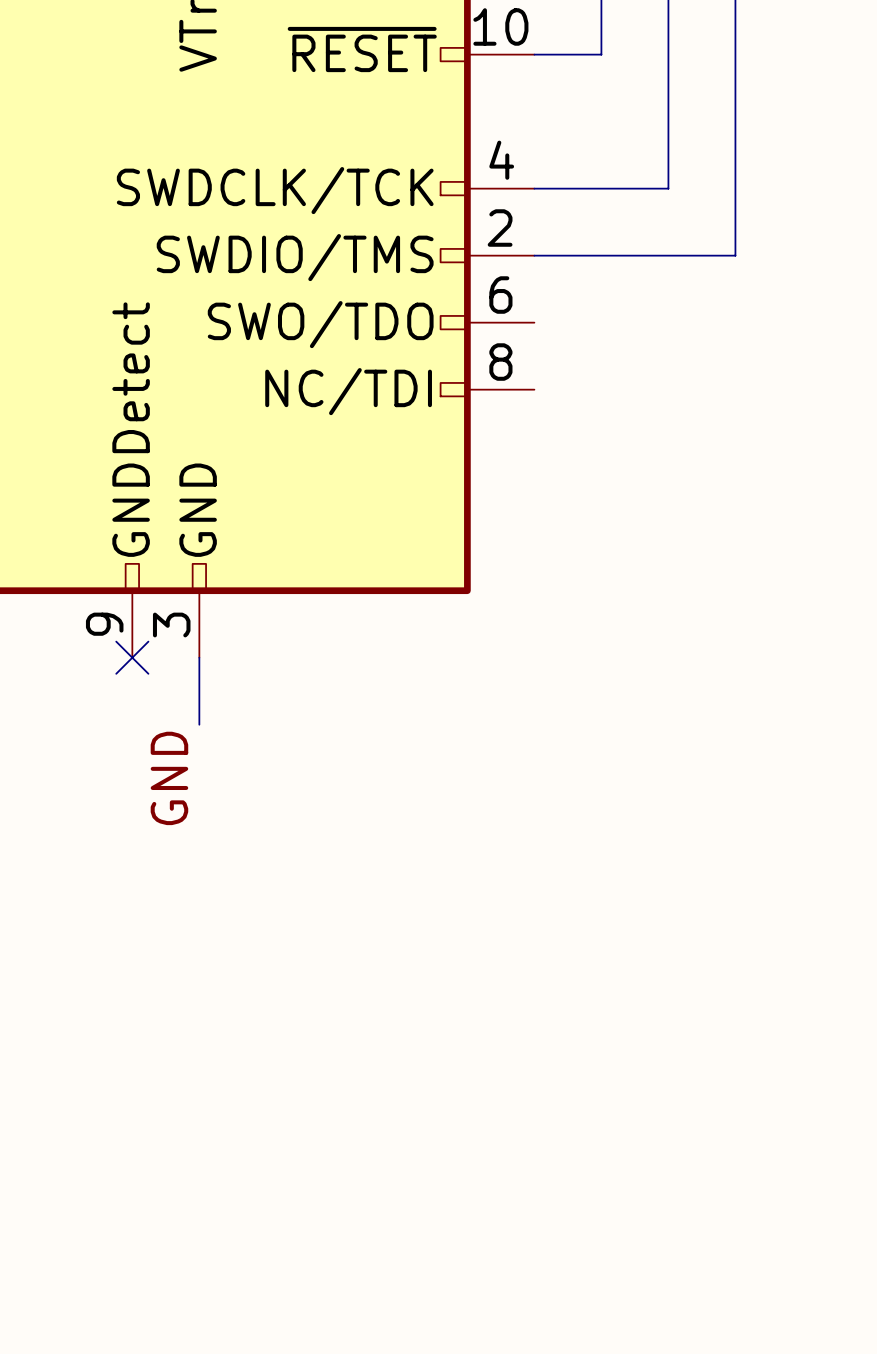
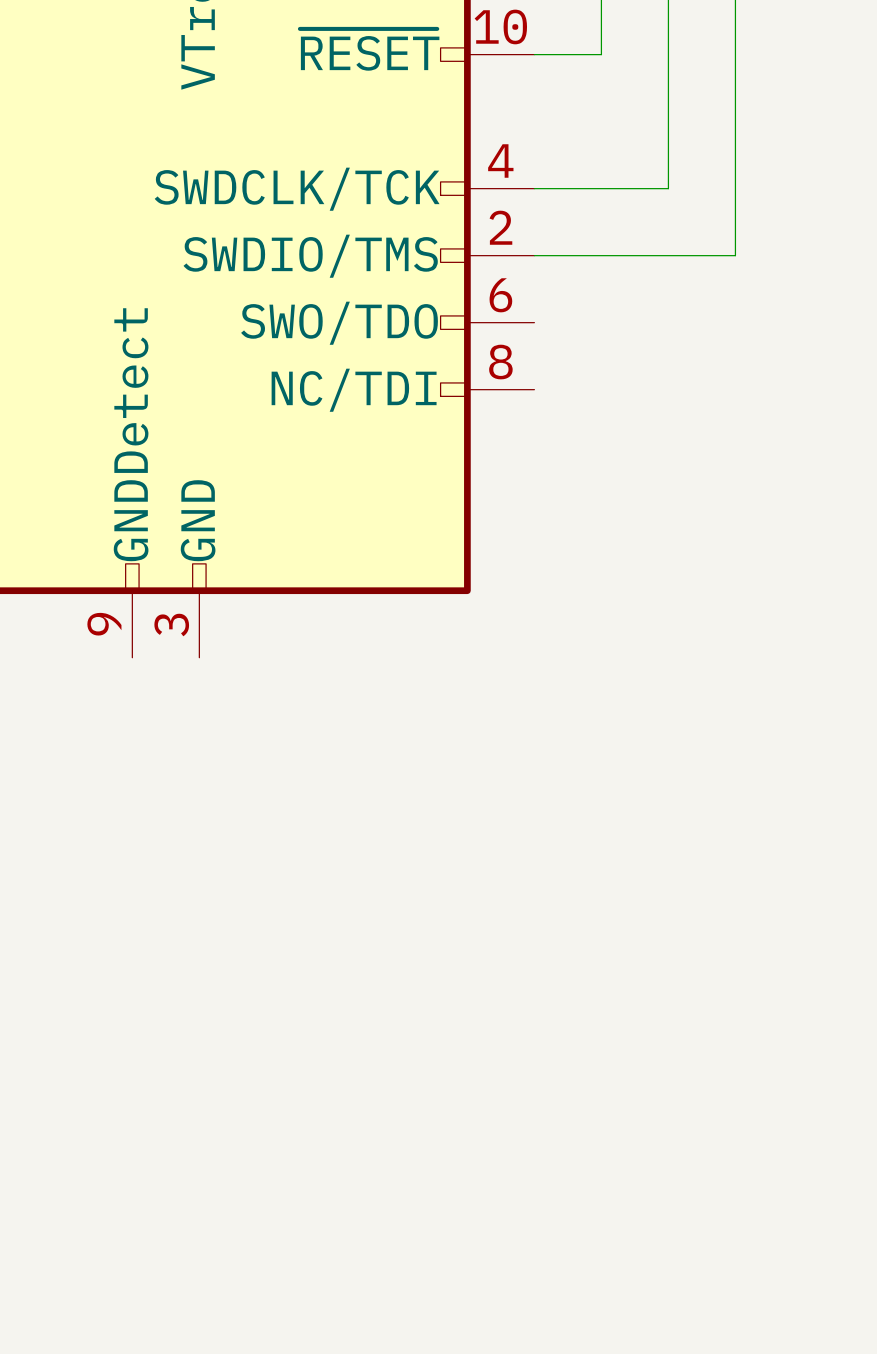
no-connect mark: (132, 657) -> none
wire: (199, 657) (199, 724) -> none
label: GND (169, 778) -> none

